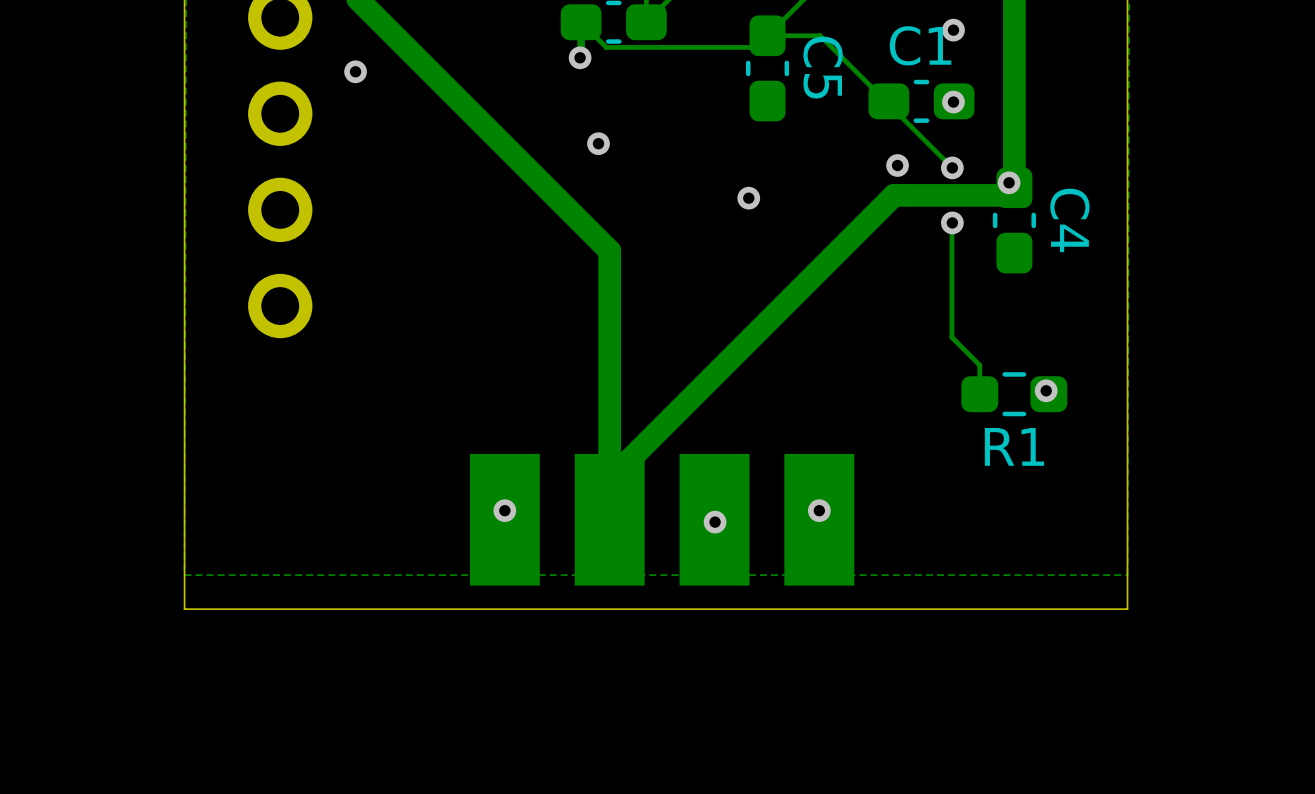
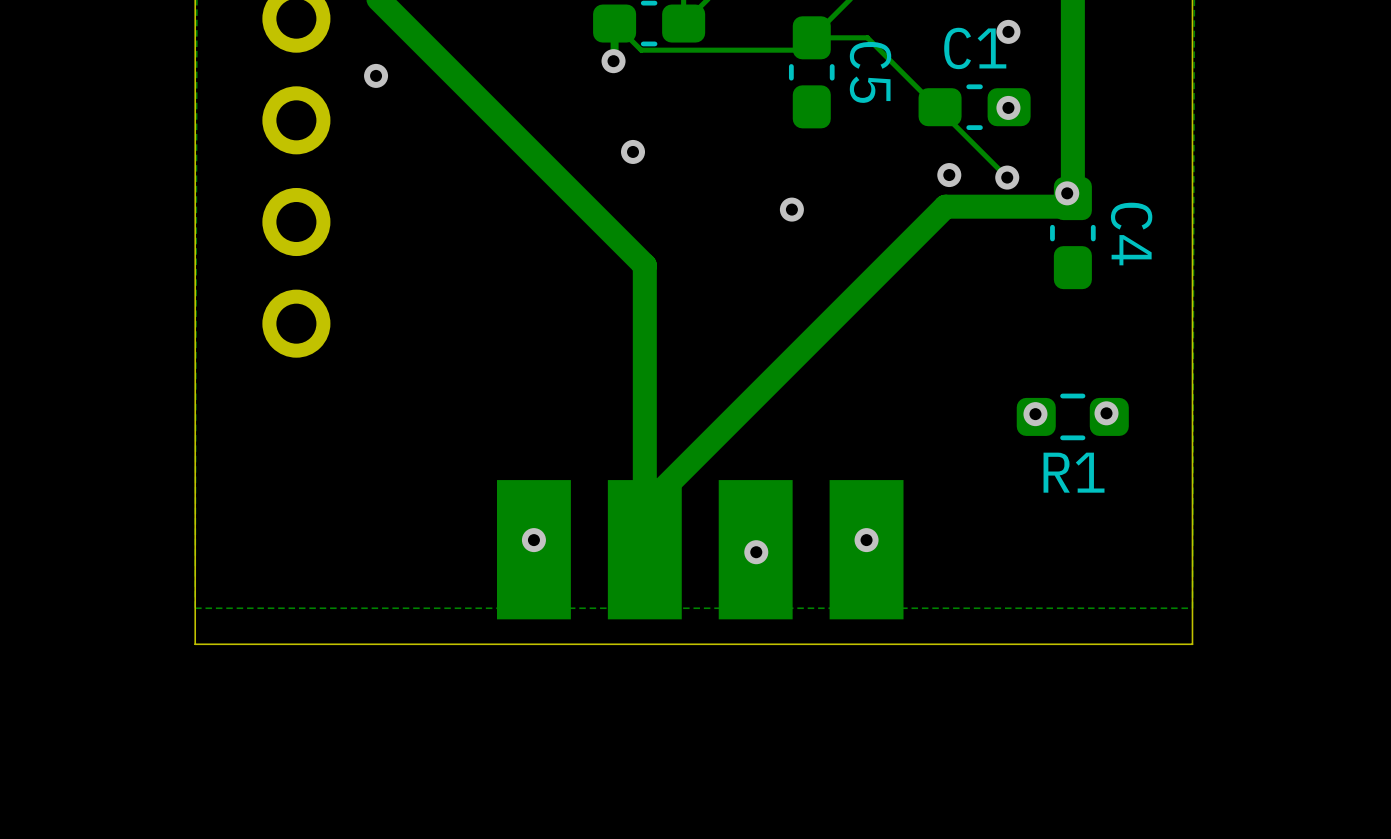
via position: (952, 222) -> (1035, 414)
track: (951, 223) (951, 337) (979, 365) (979, 394) -> none

